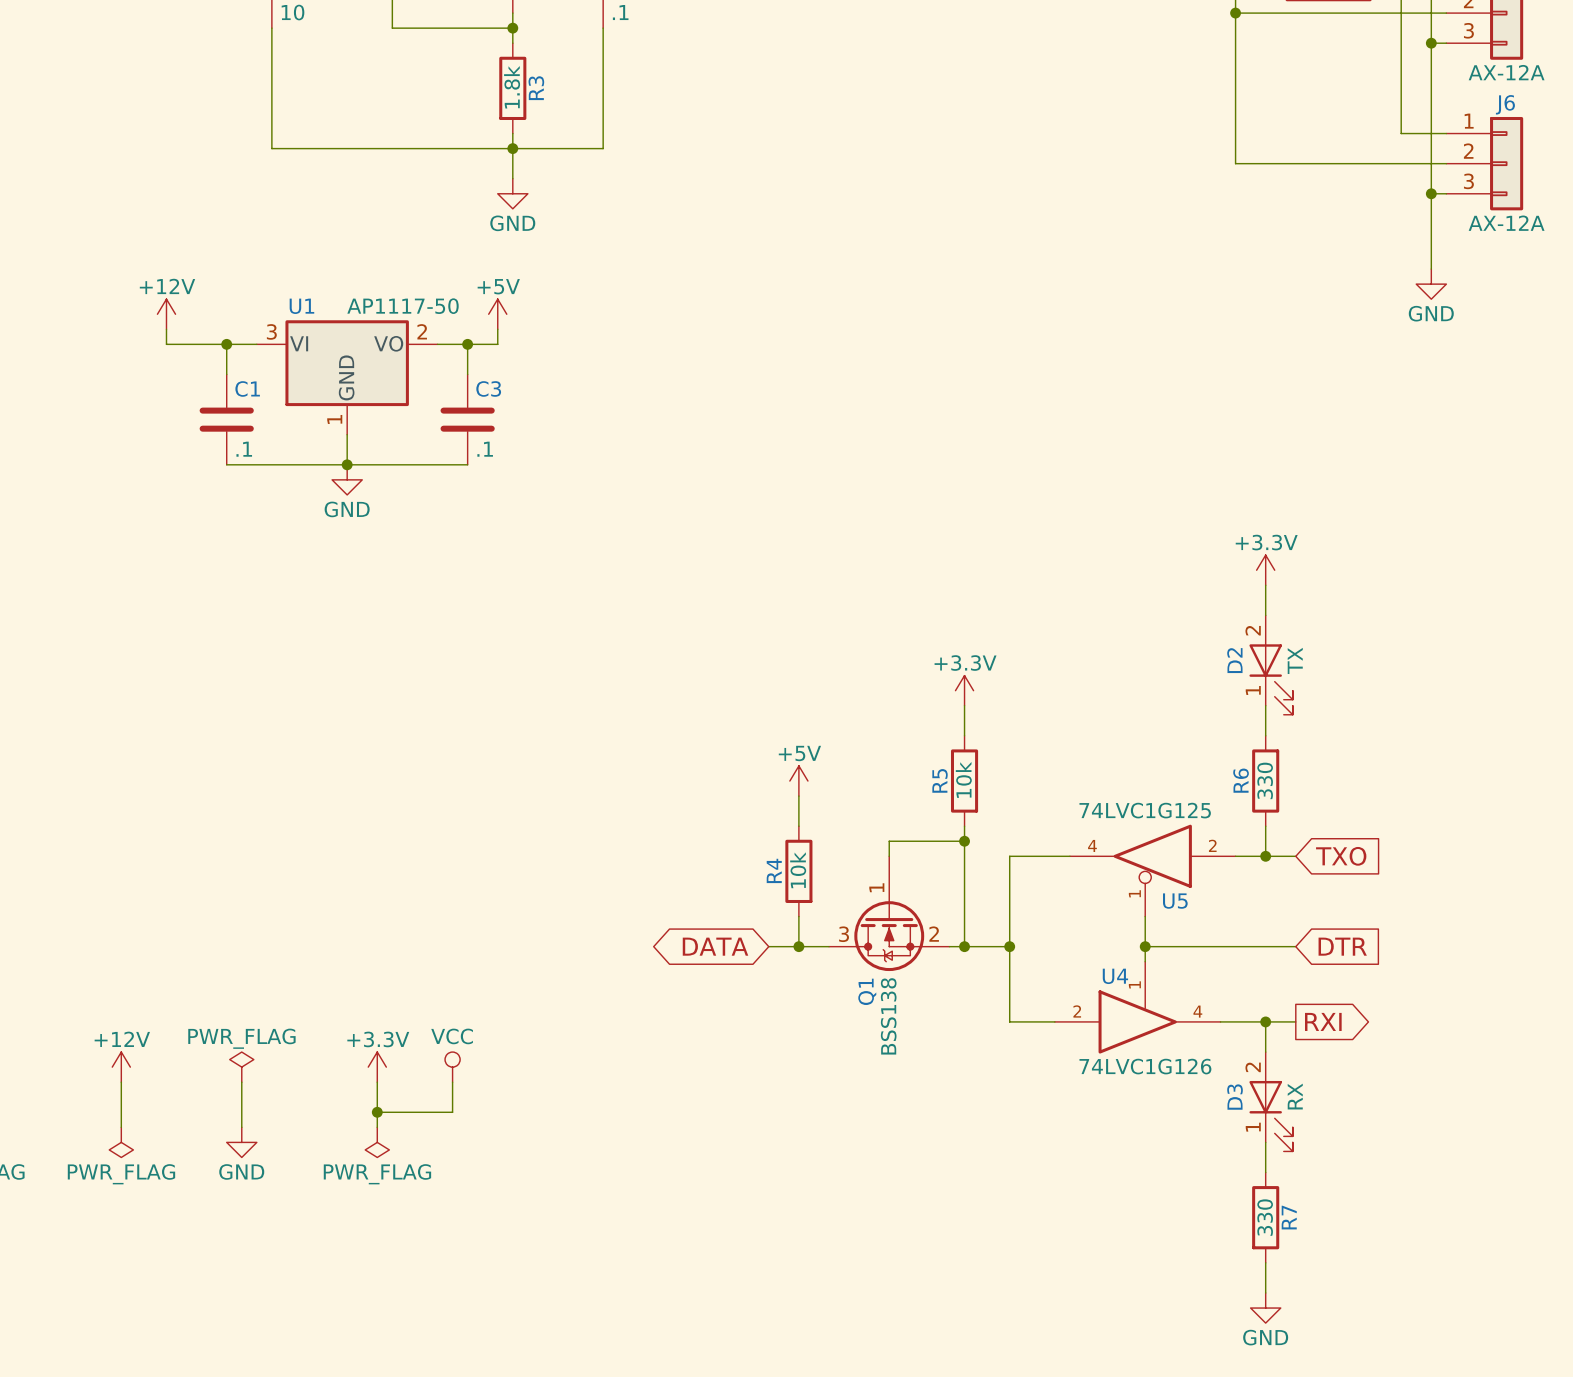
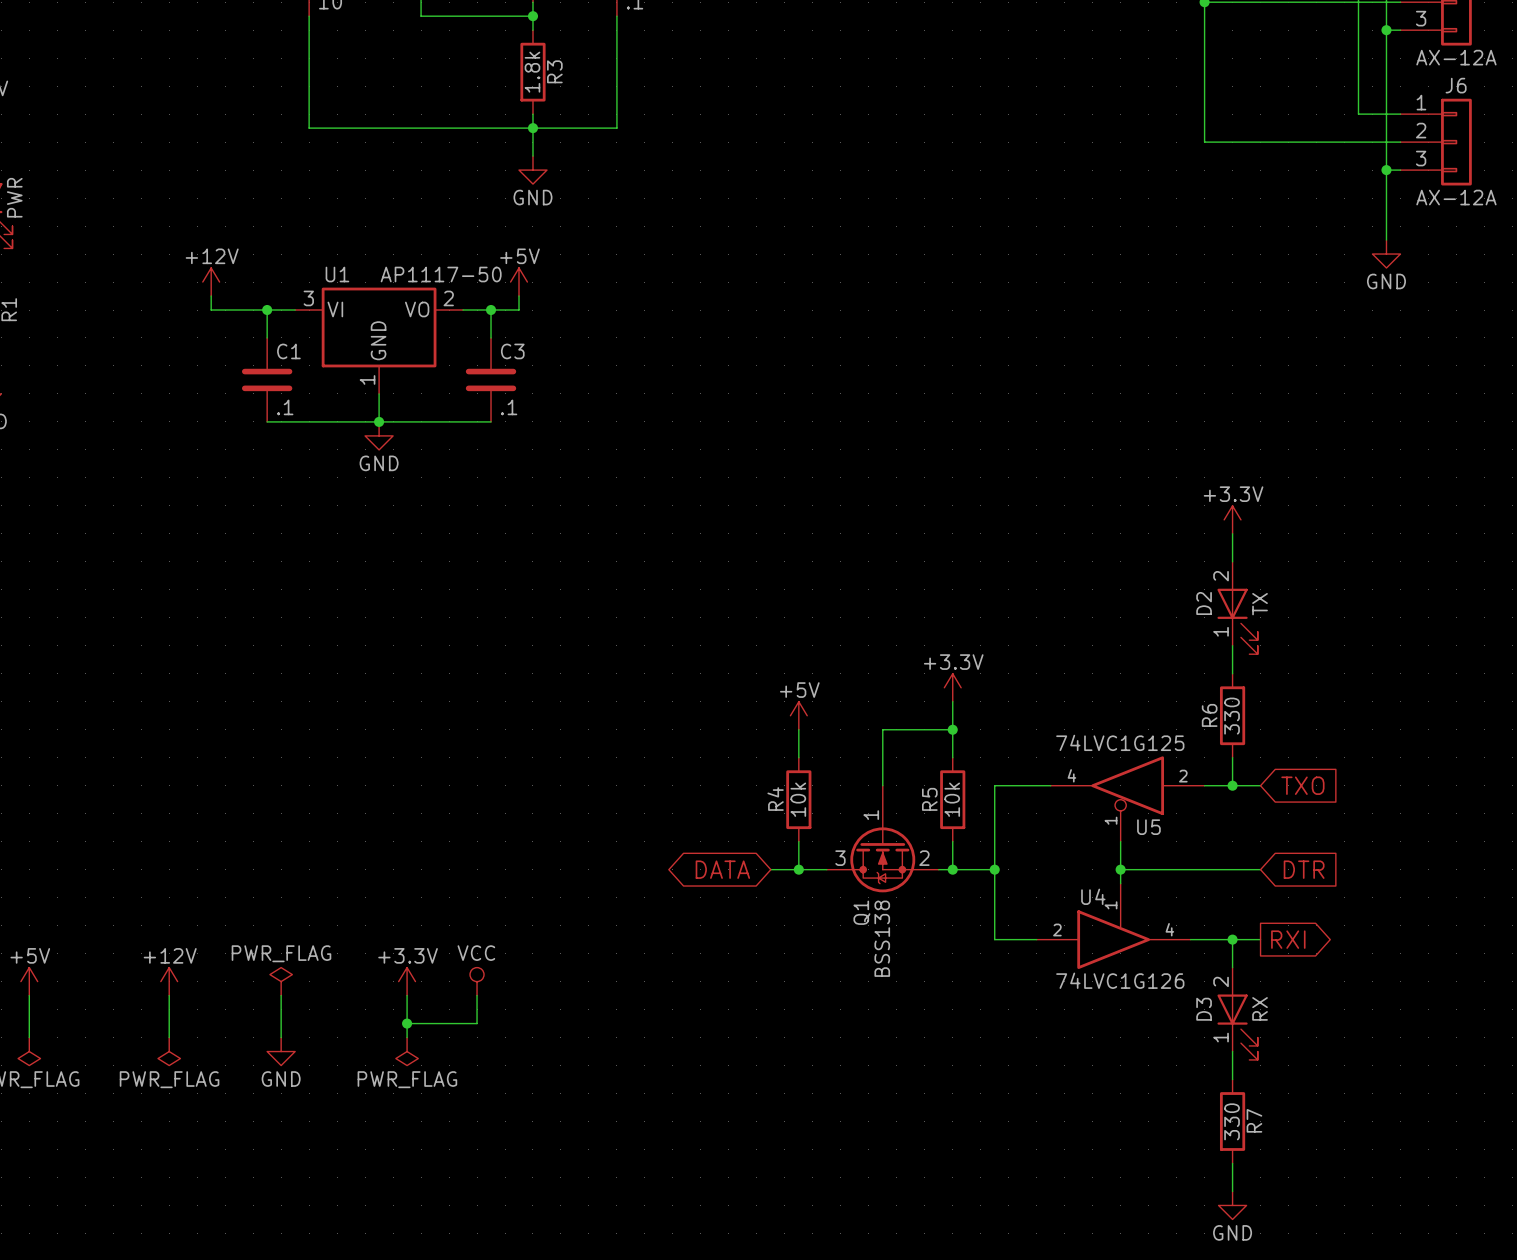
power symbol position: +3.3V (964, 690) -> +3.3V (952, 687)
wire: (964, 705) (964, 735) -> none
R5 position: (964, 781) -> (952, 799)
wire: (964, 826) (964, 916) -> (952, 757) (952, 701)
wire: (889, 841) (964, 841) -> (882, 771) (882, 729) (952, 729)
junction position: (964, 841) -> (952, 729)

